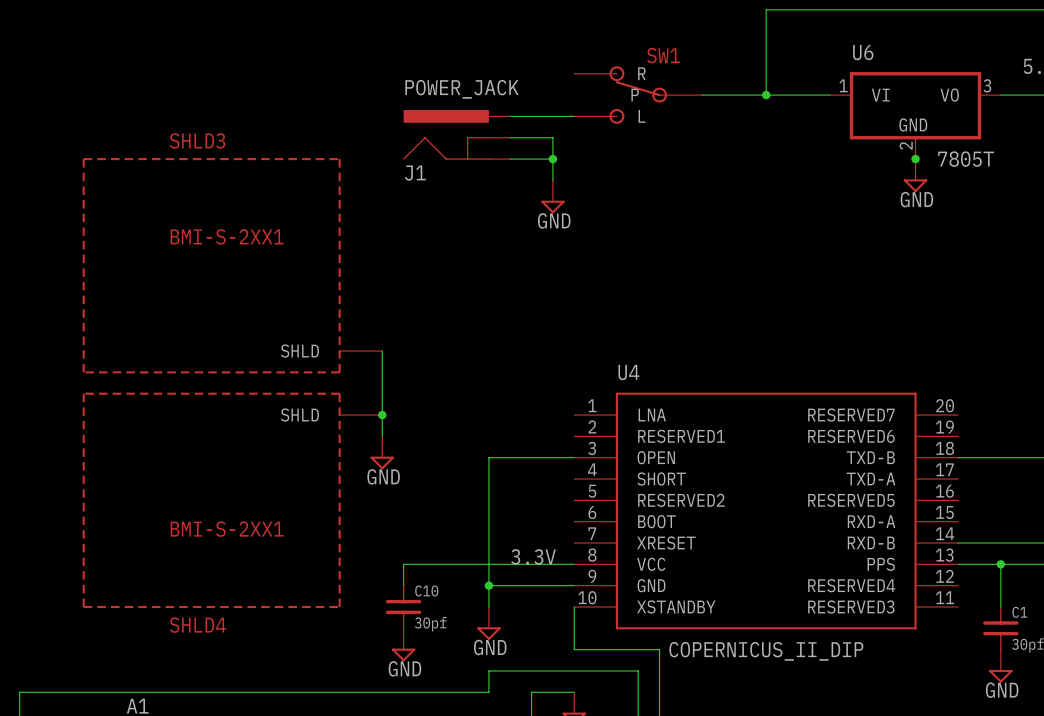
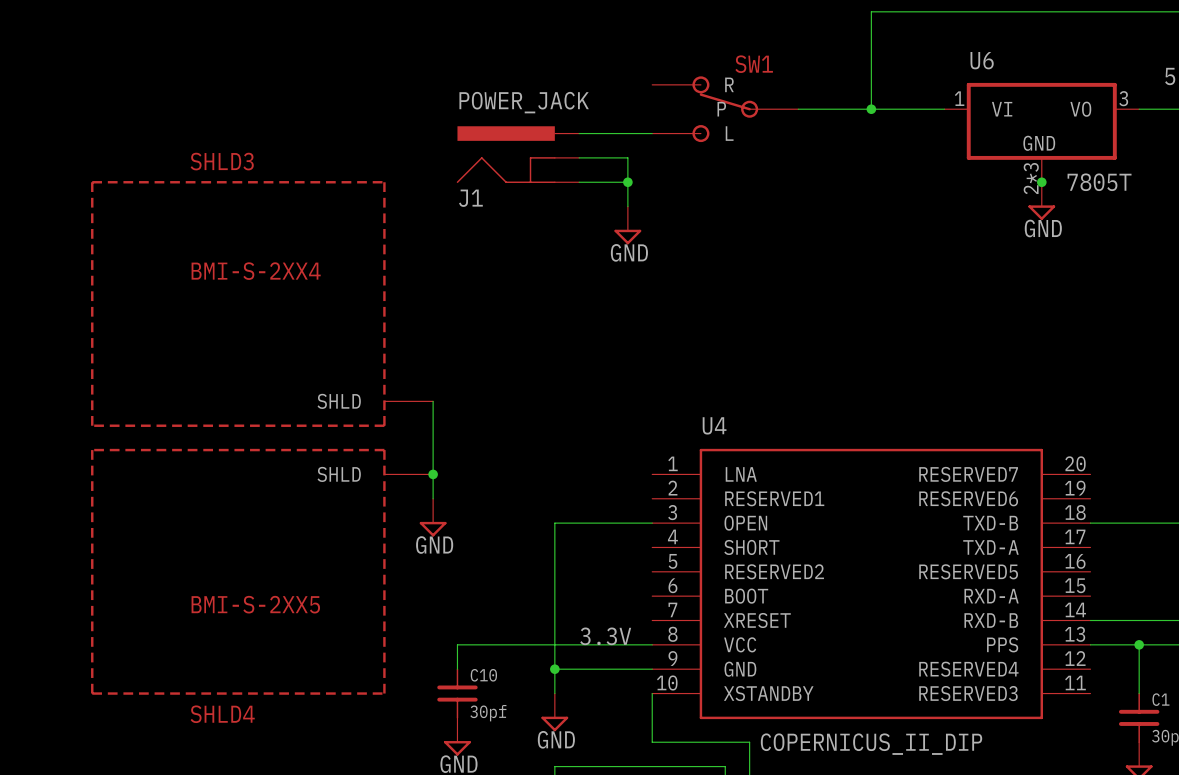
U6 pin number: 2 (906, 145) -> 2*3 (1031, 178)
SHLD3 value: BMI-S-2XX1 (227, 236) -> BMI-S-2XX4 (256, 271)
SHLD4 value: BMI-S-2XX1 (227, 529) -> BMI-S-2XX5 (255, 604)

